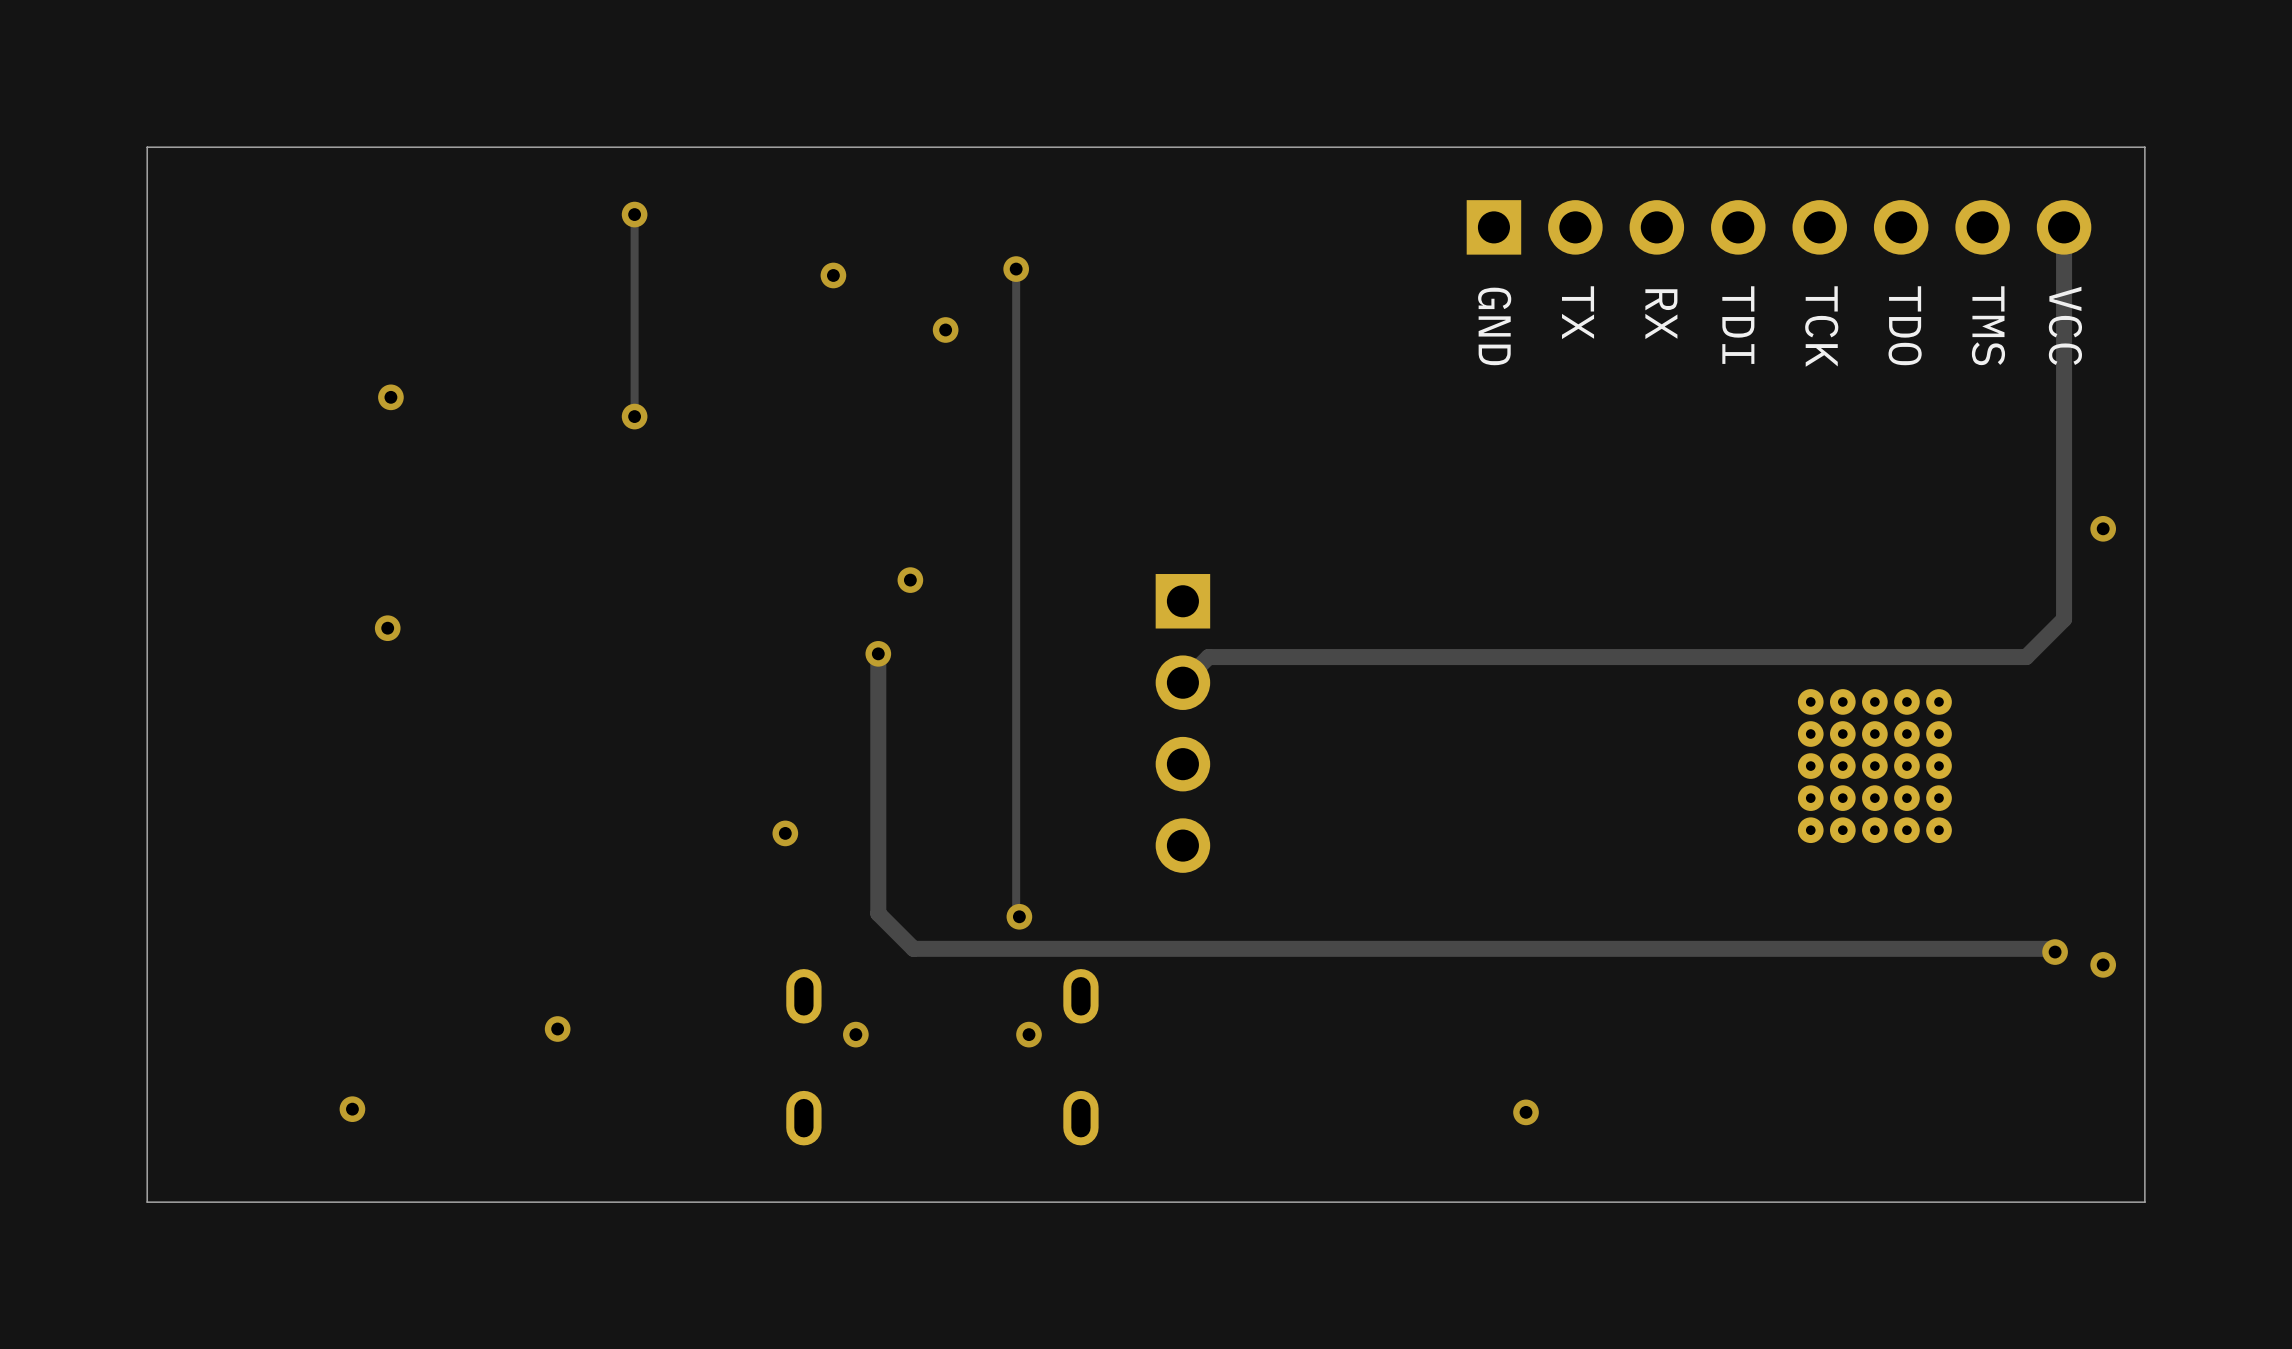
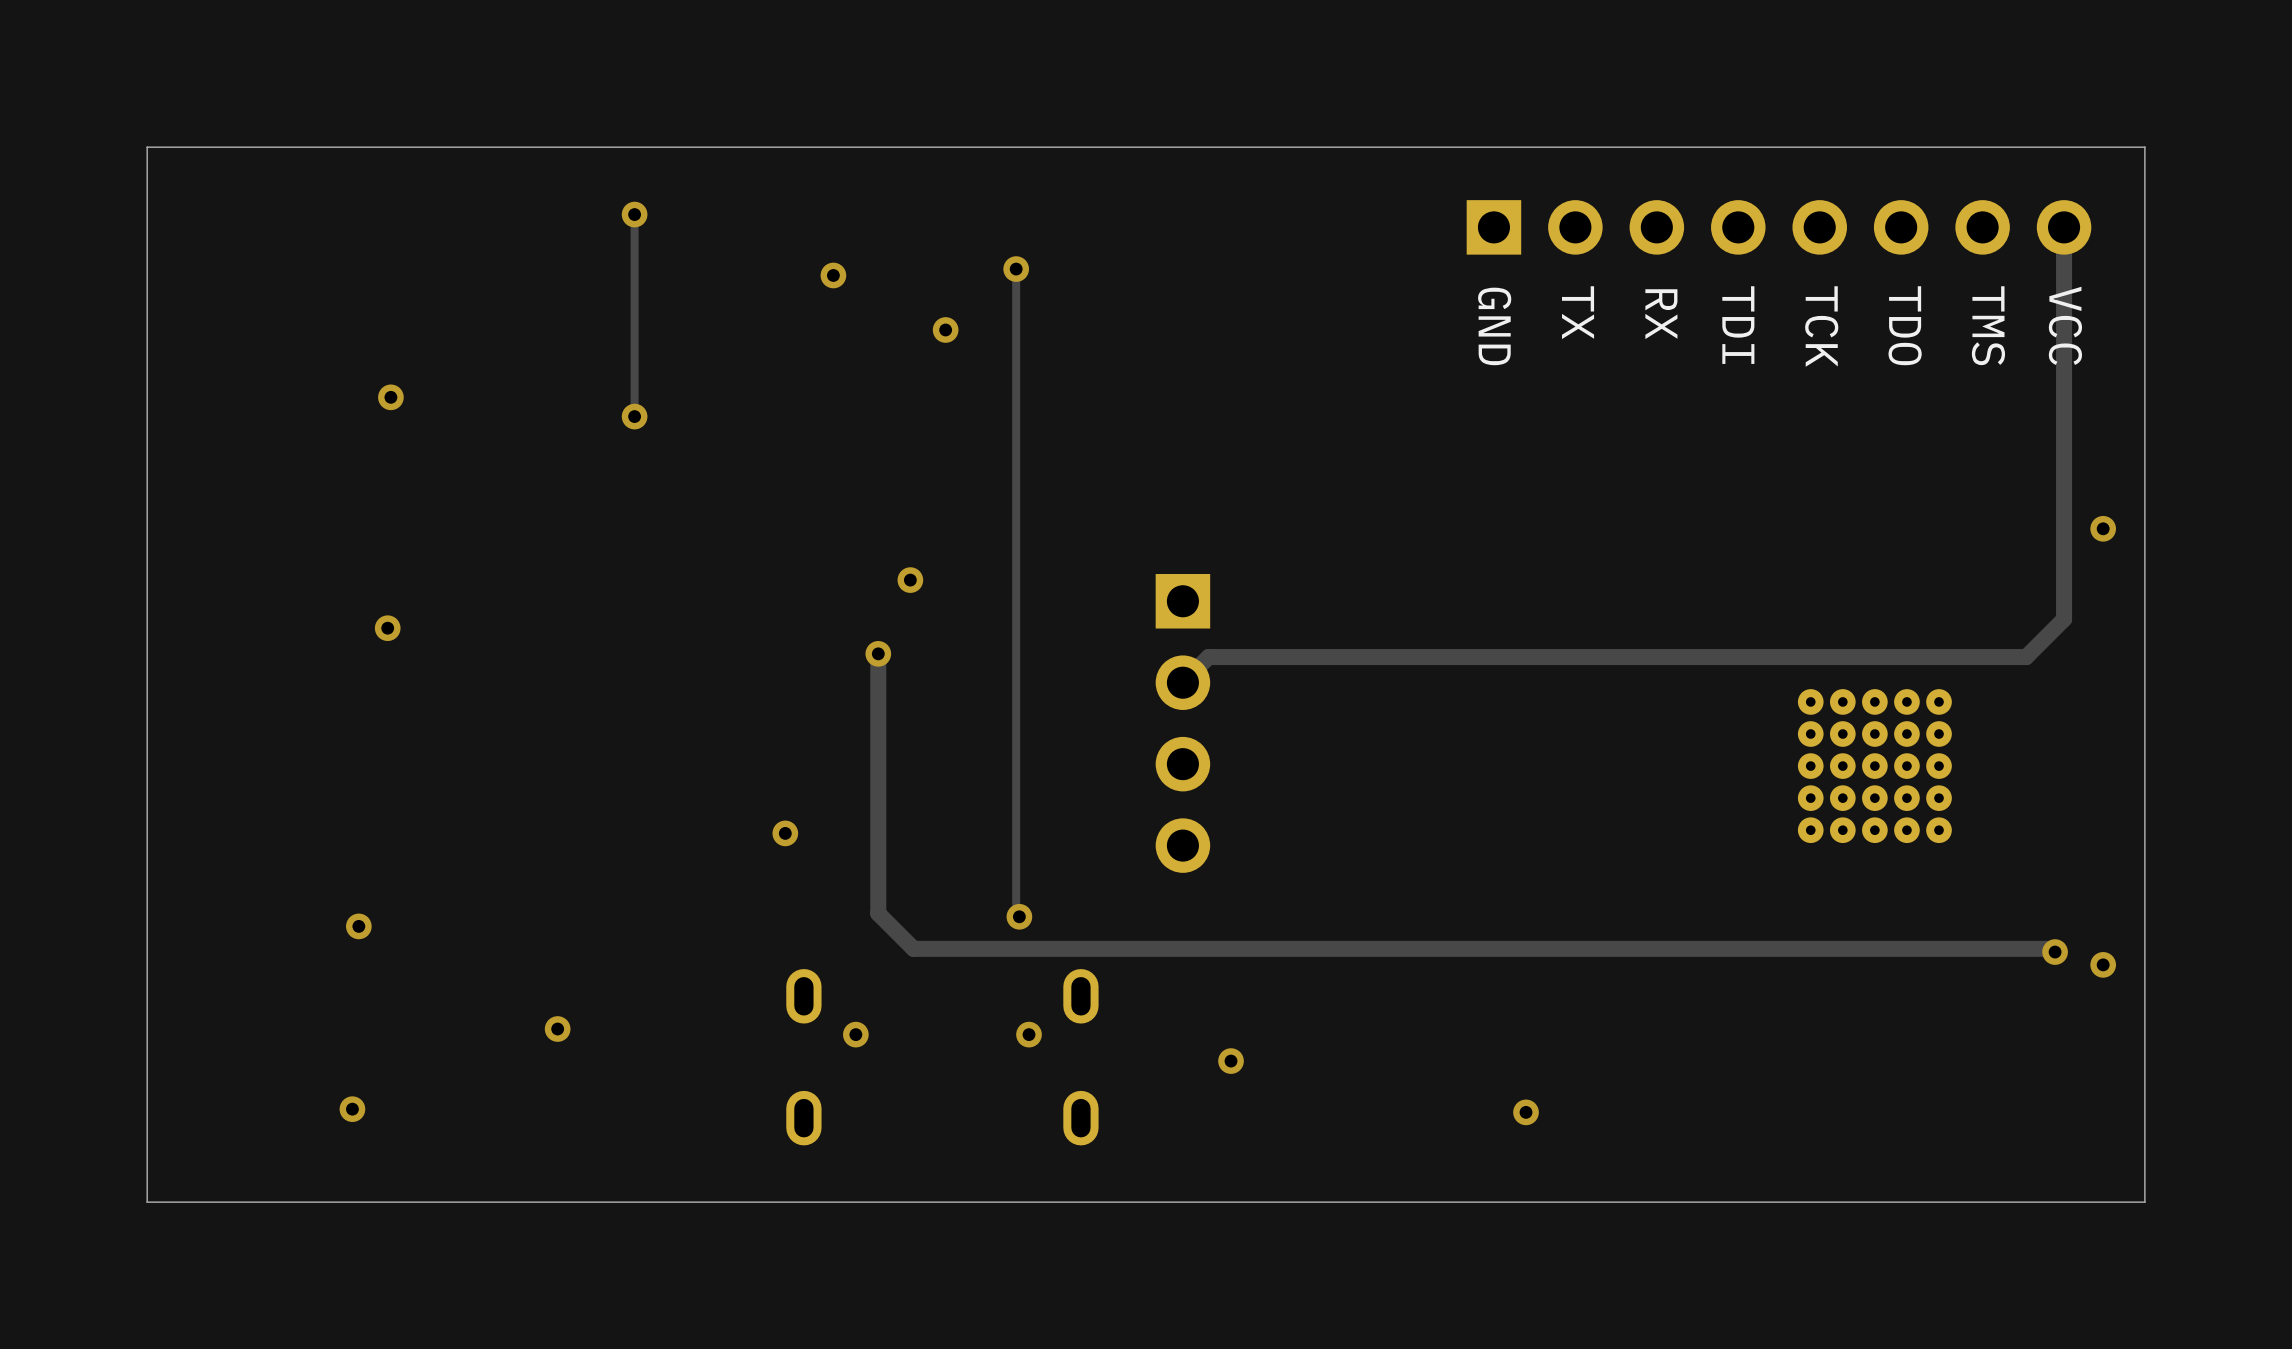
via: none -> (358, 926)
via: none -> (1231, 1061)

